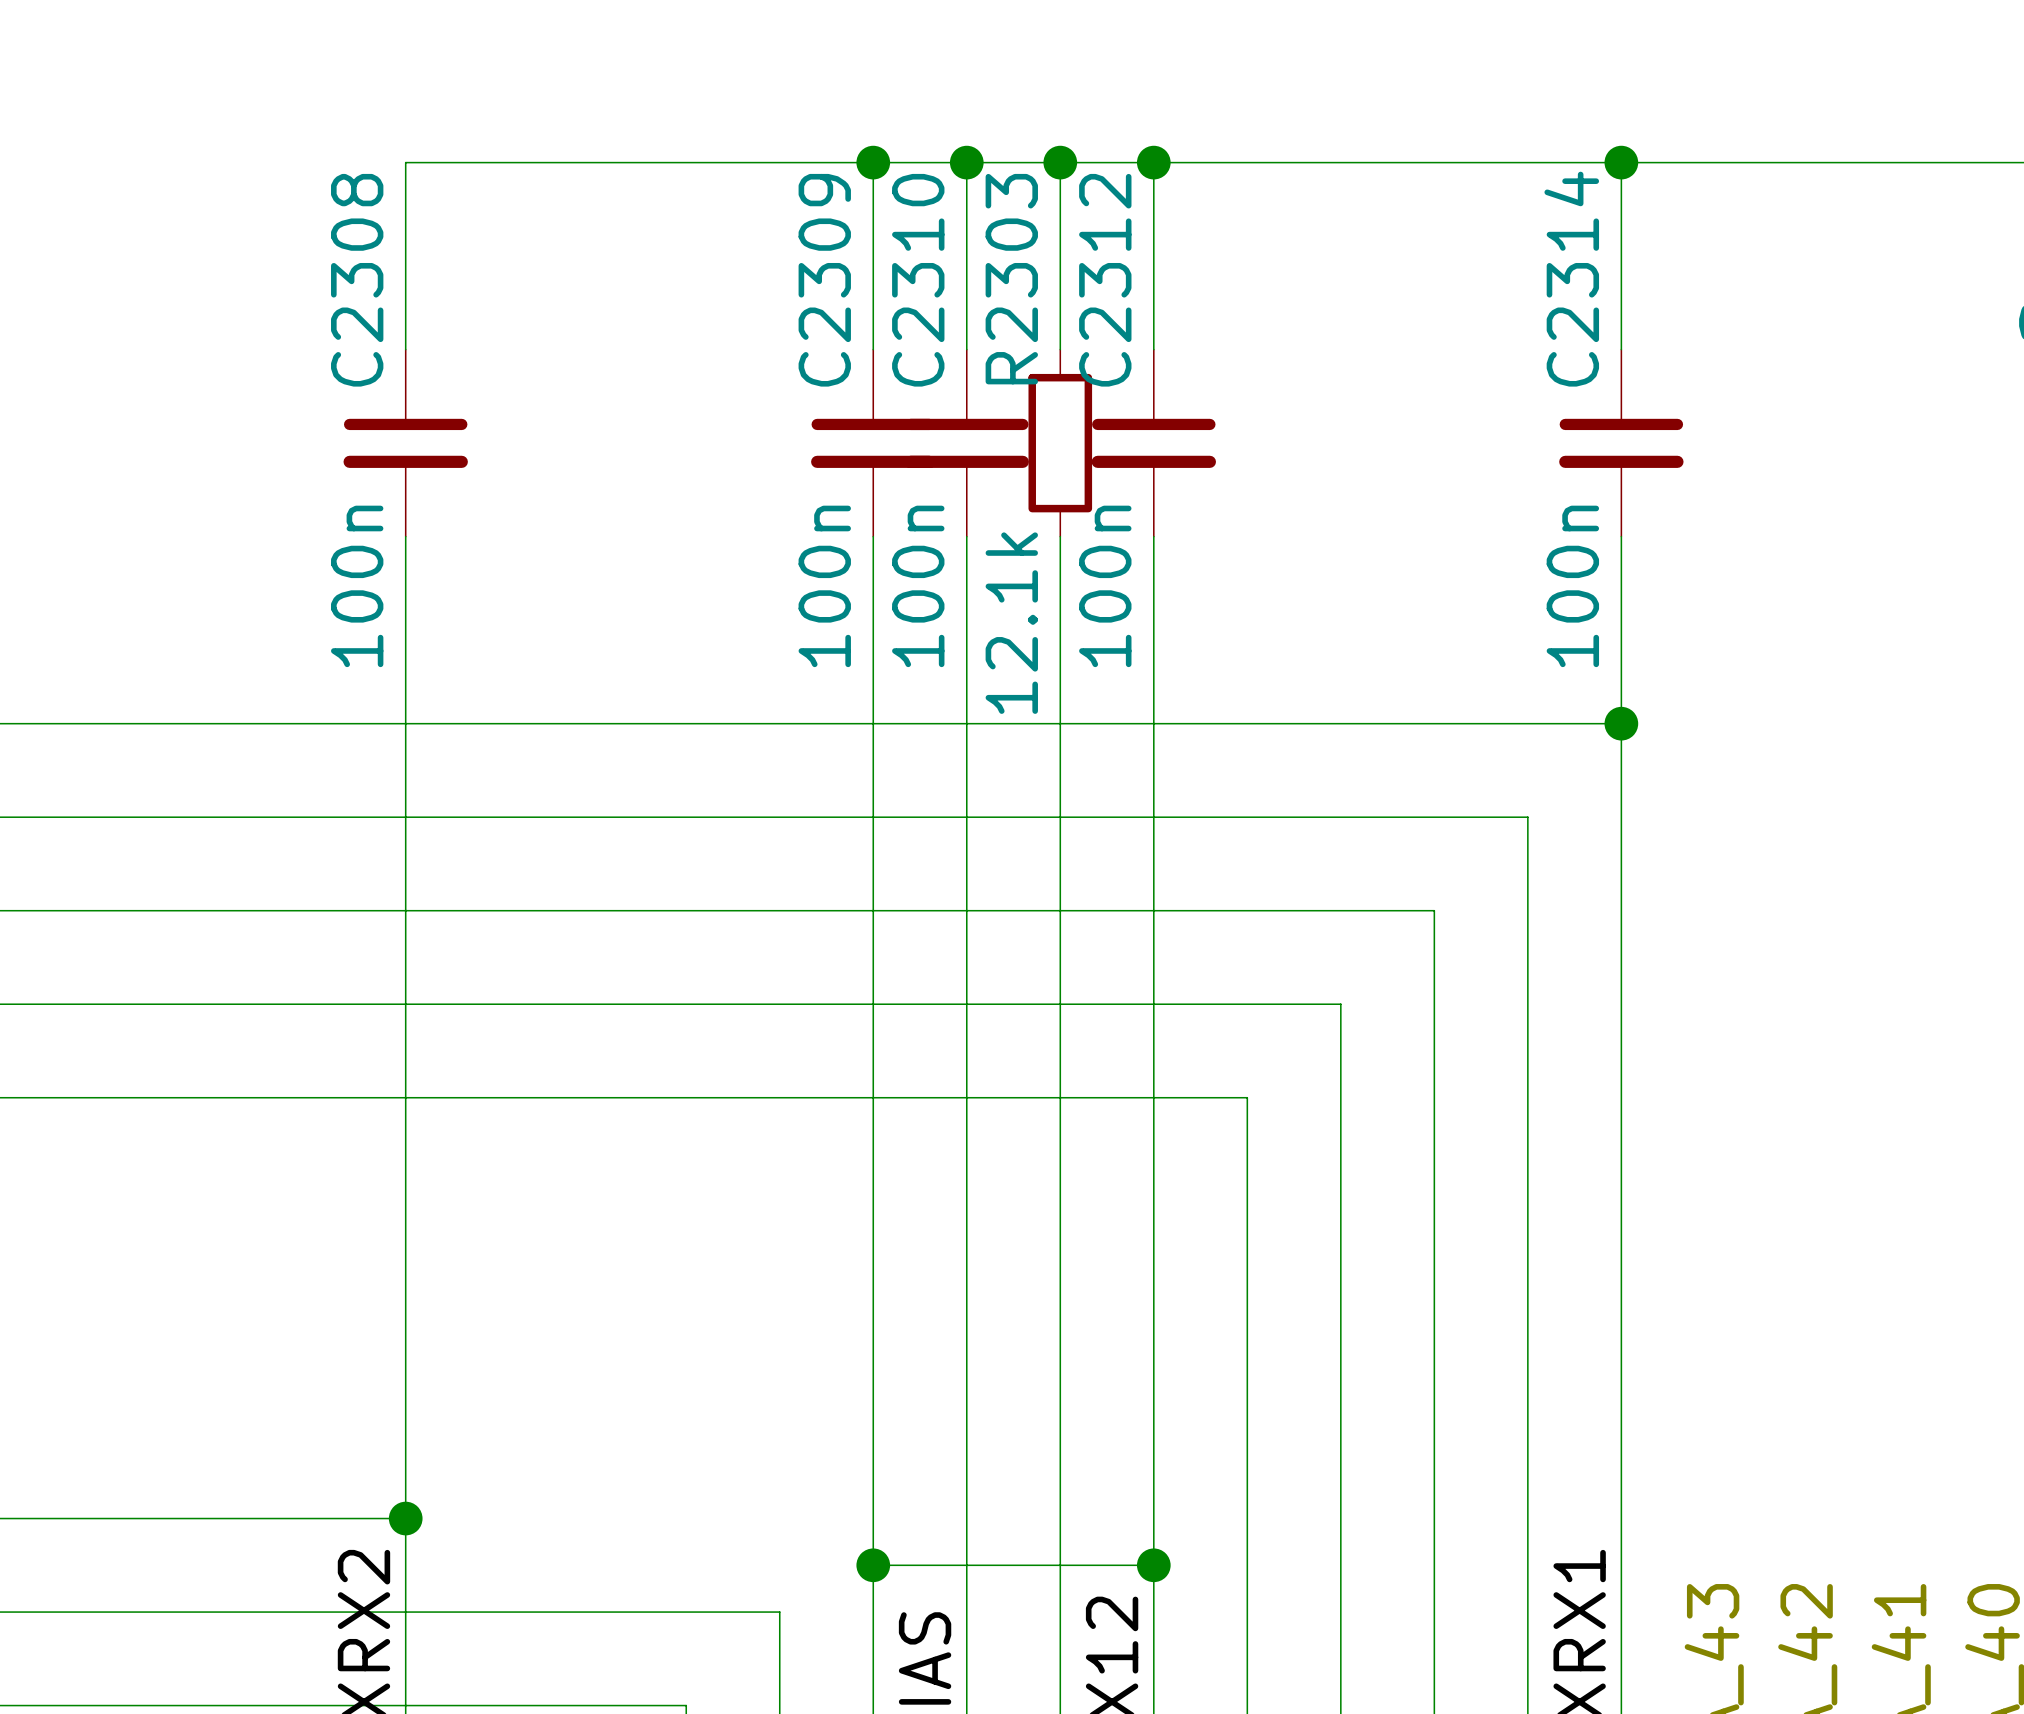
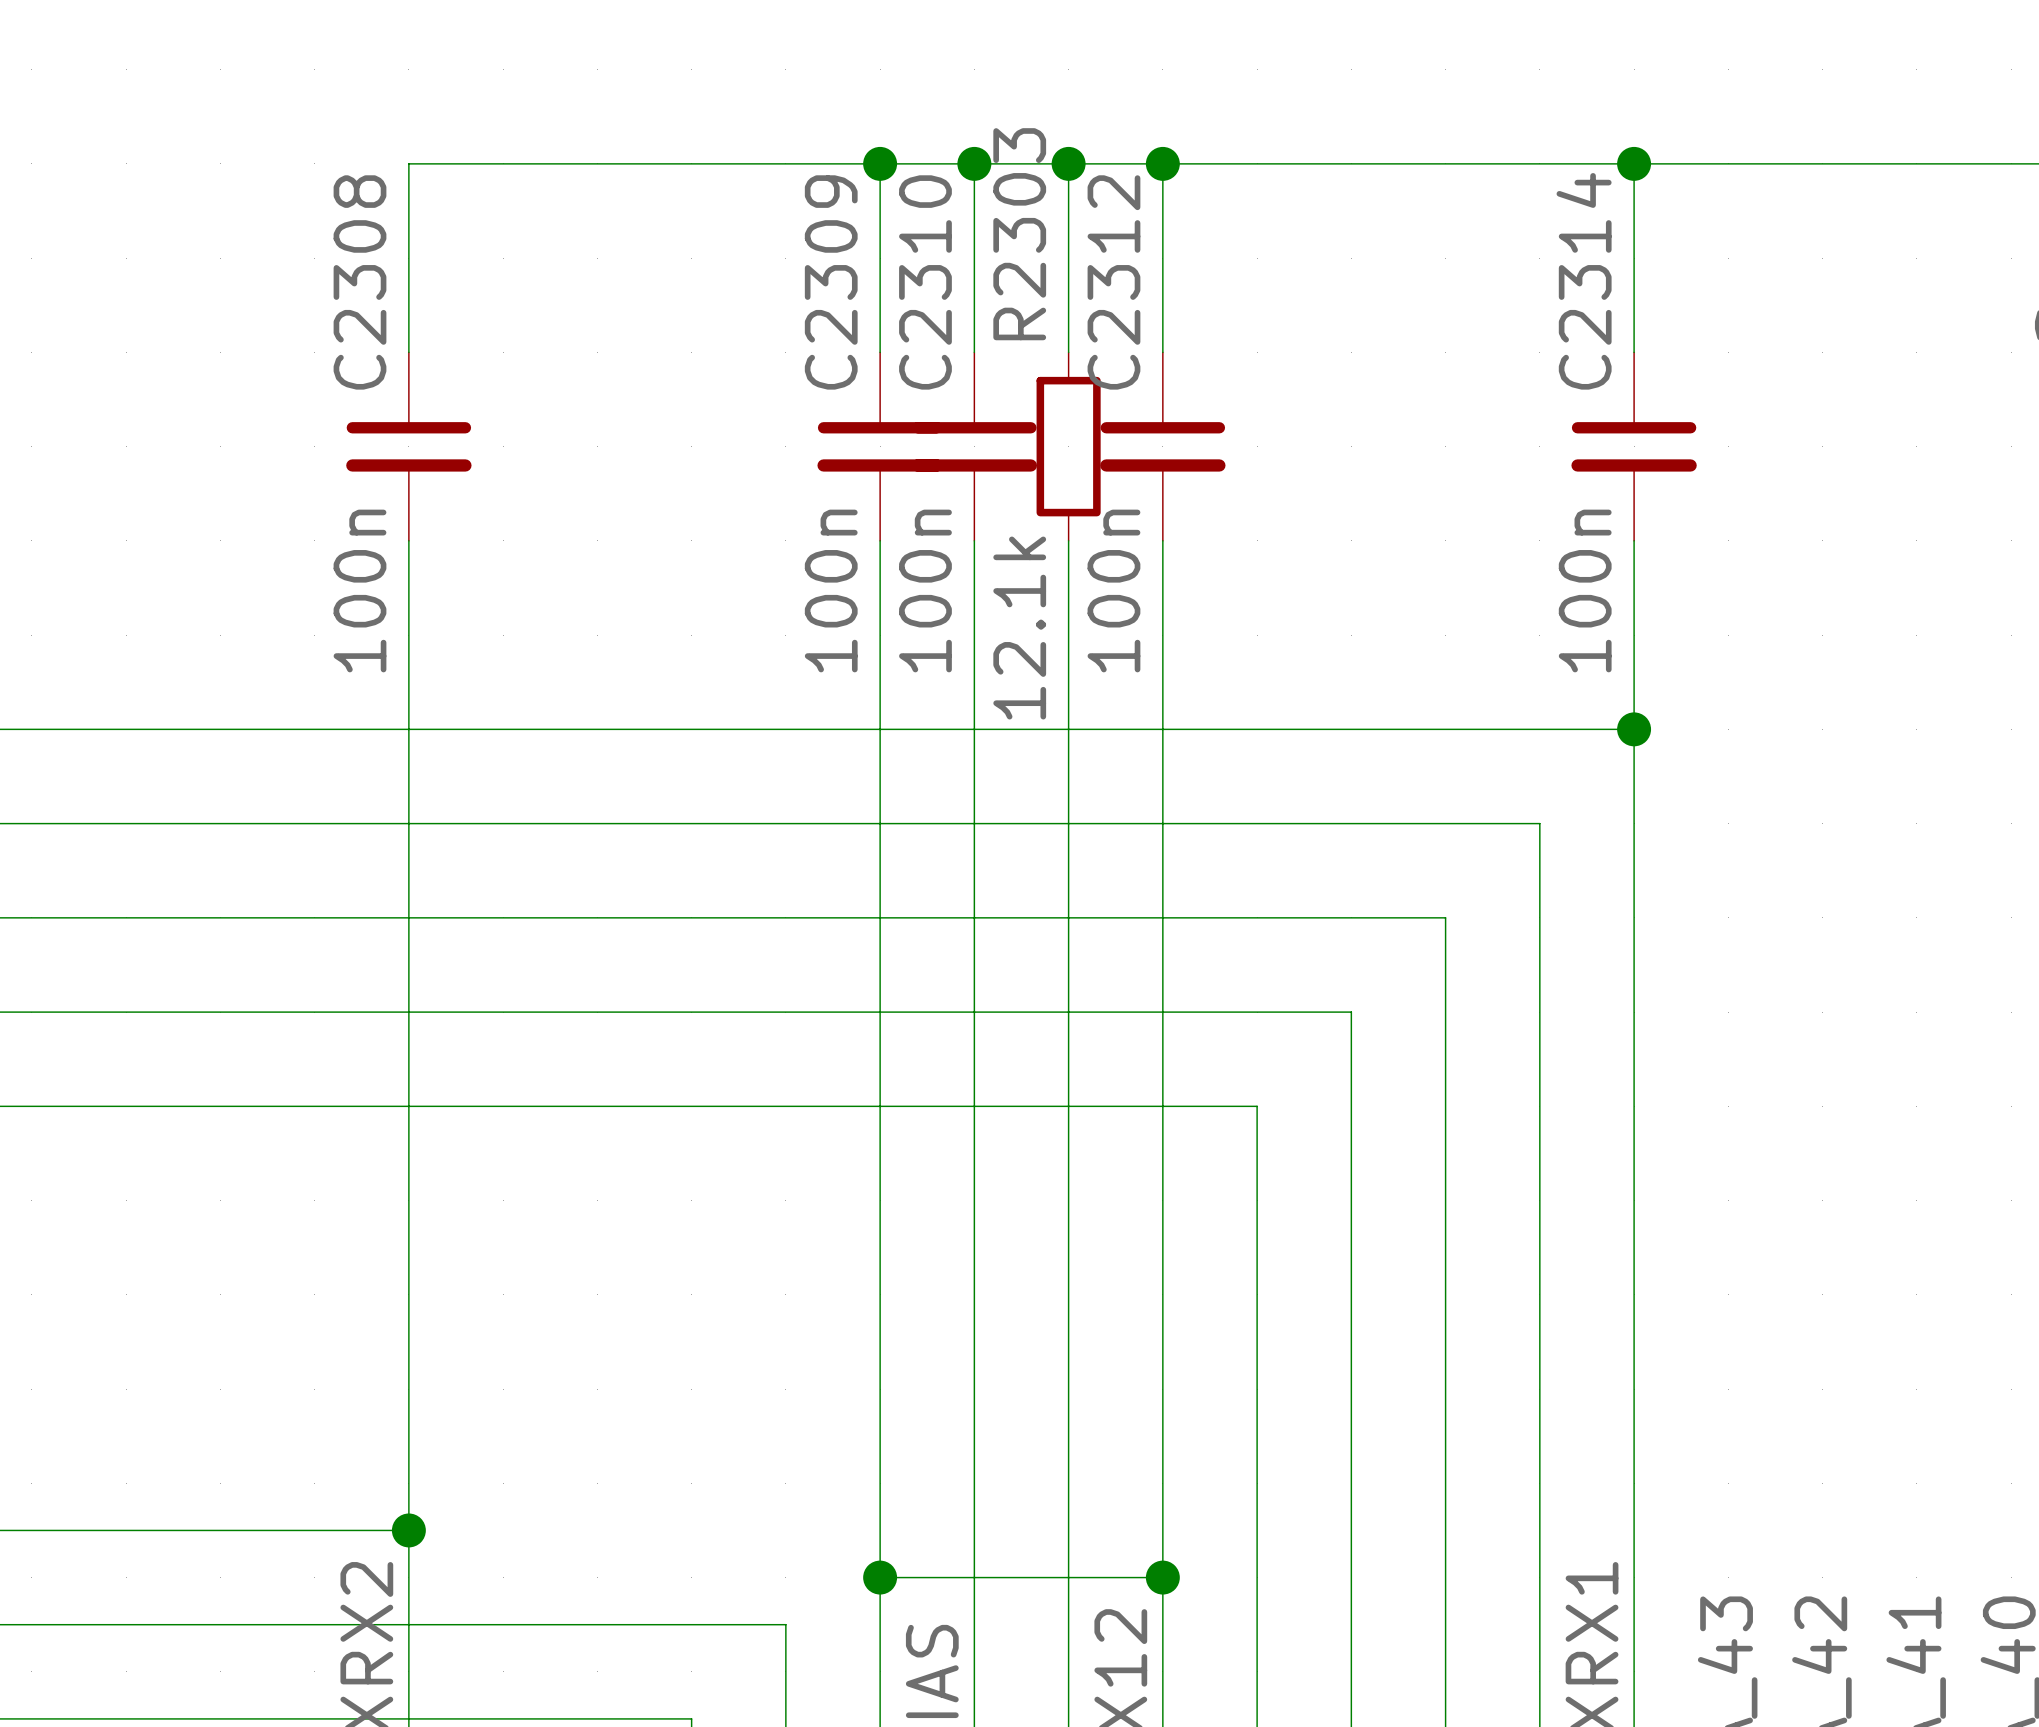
R2303 name position: R2303 (1011, 279) -> R2303 (1019, 234)

